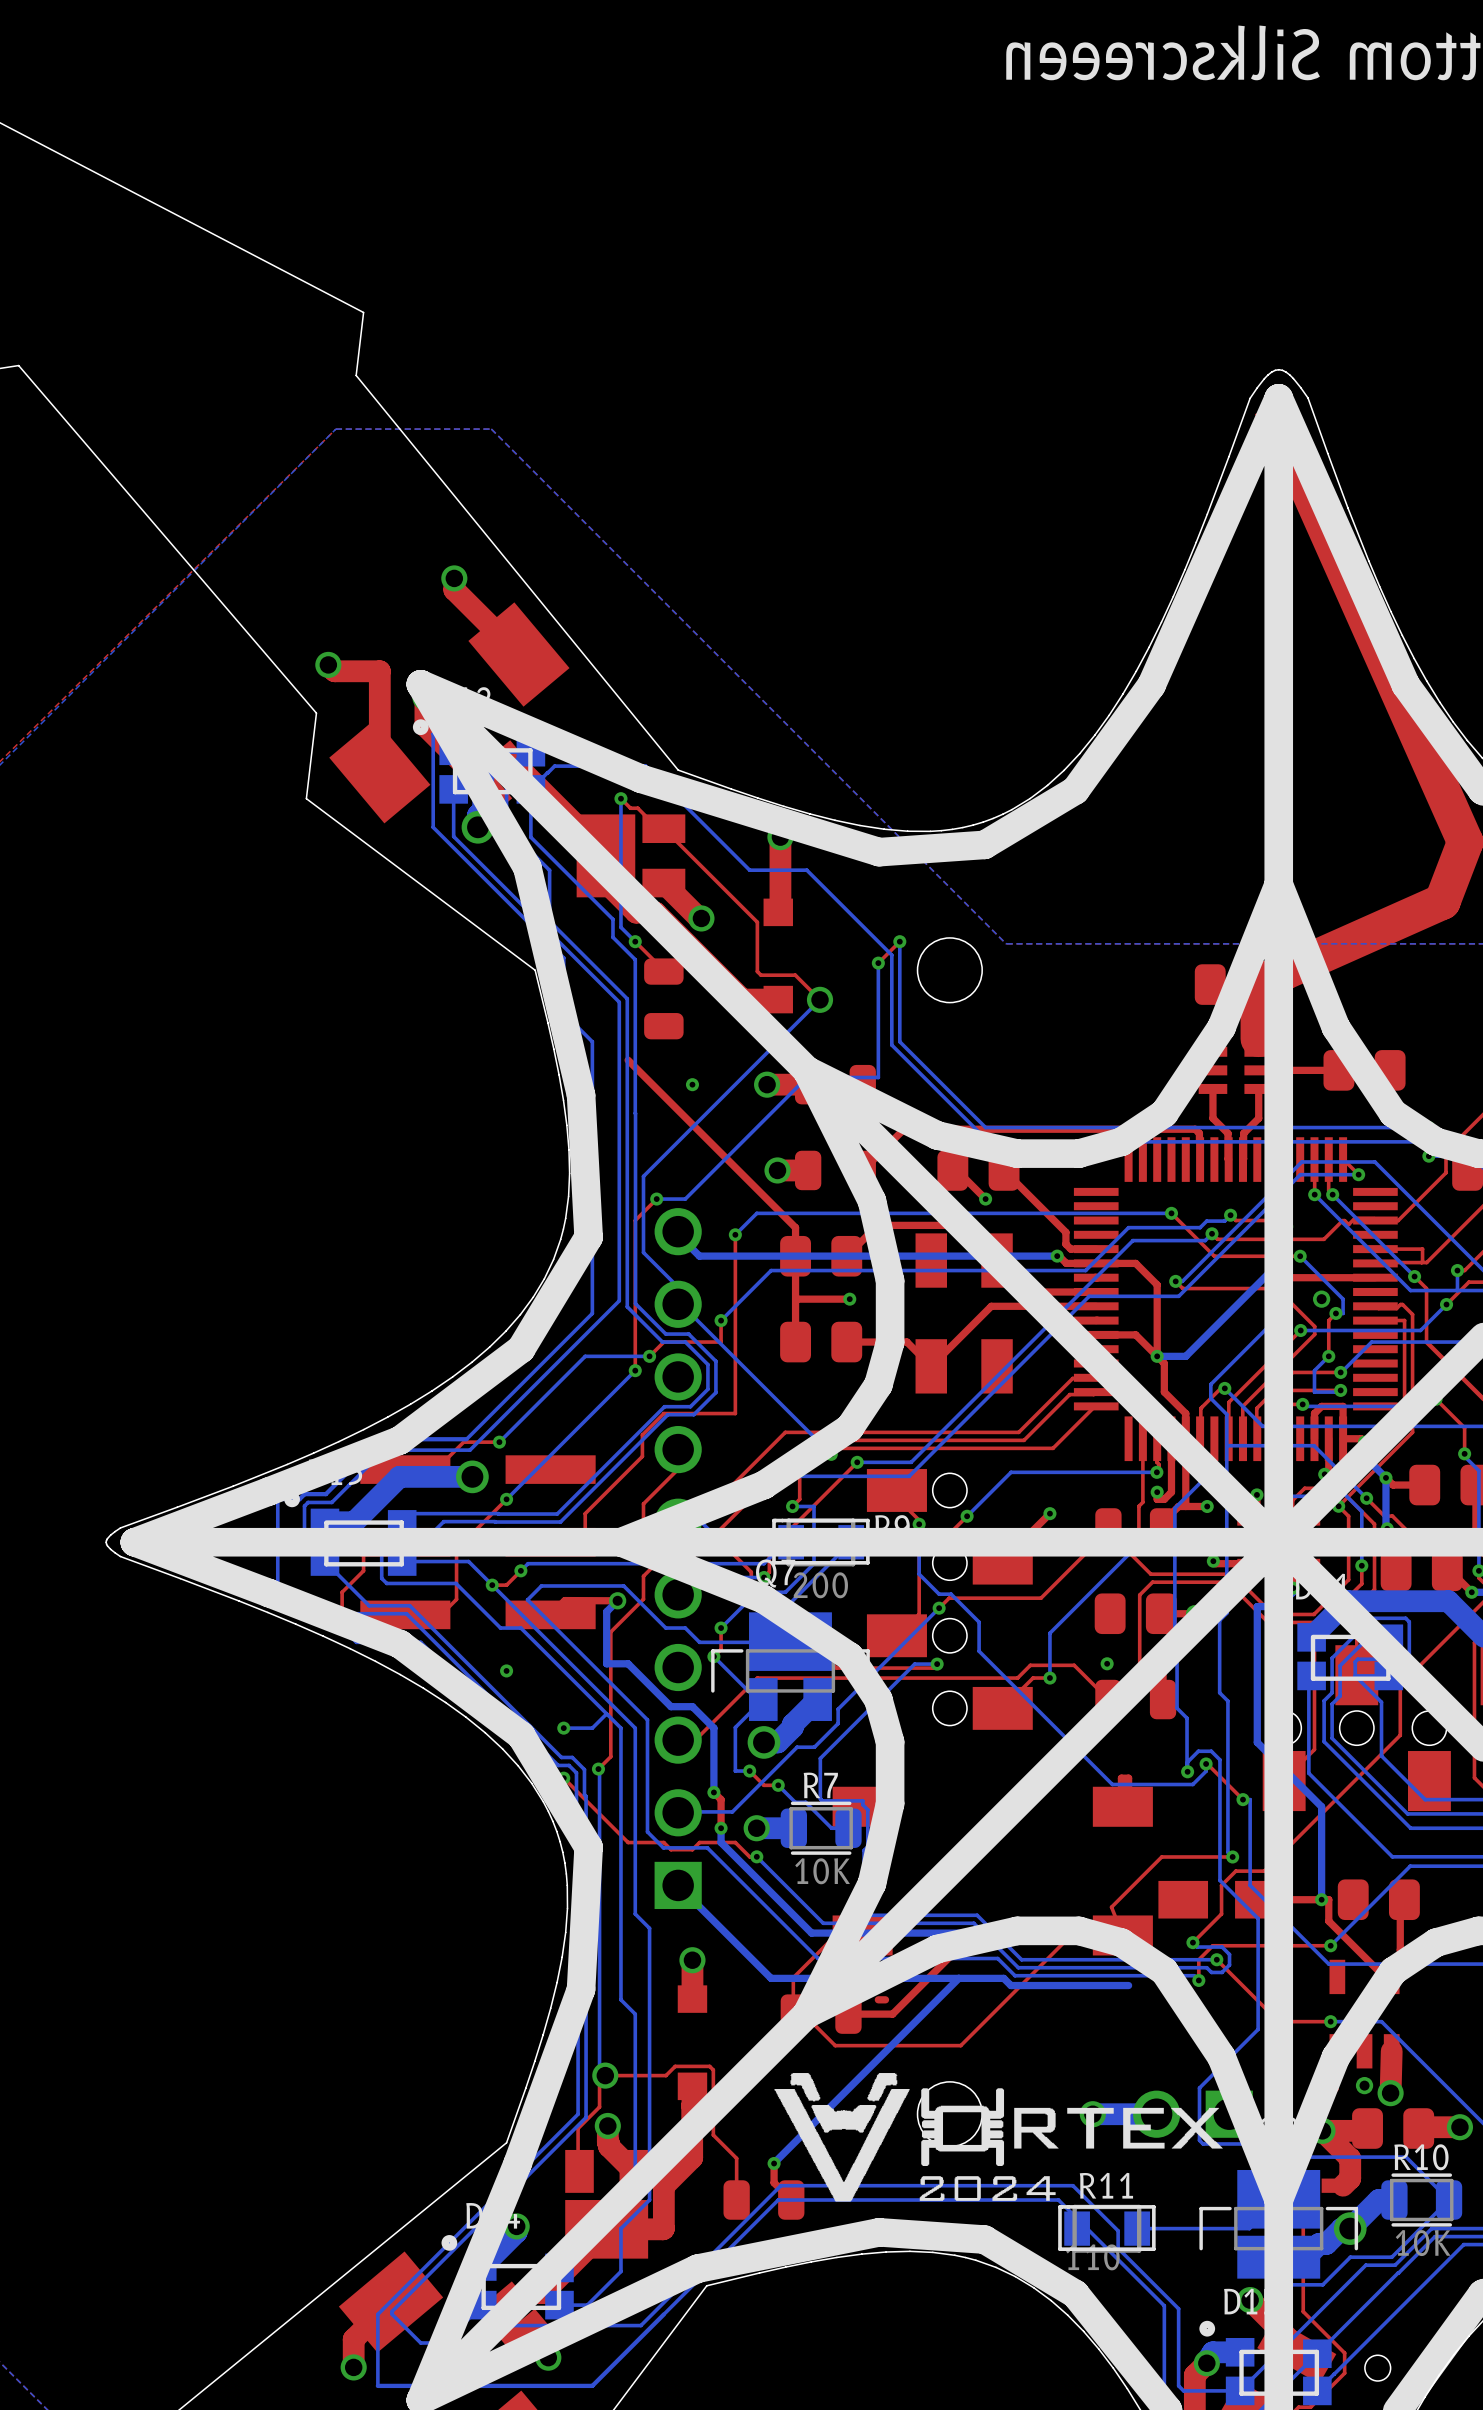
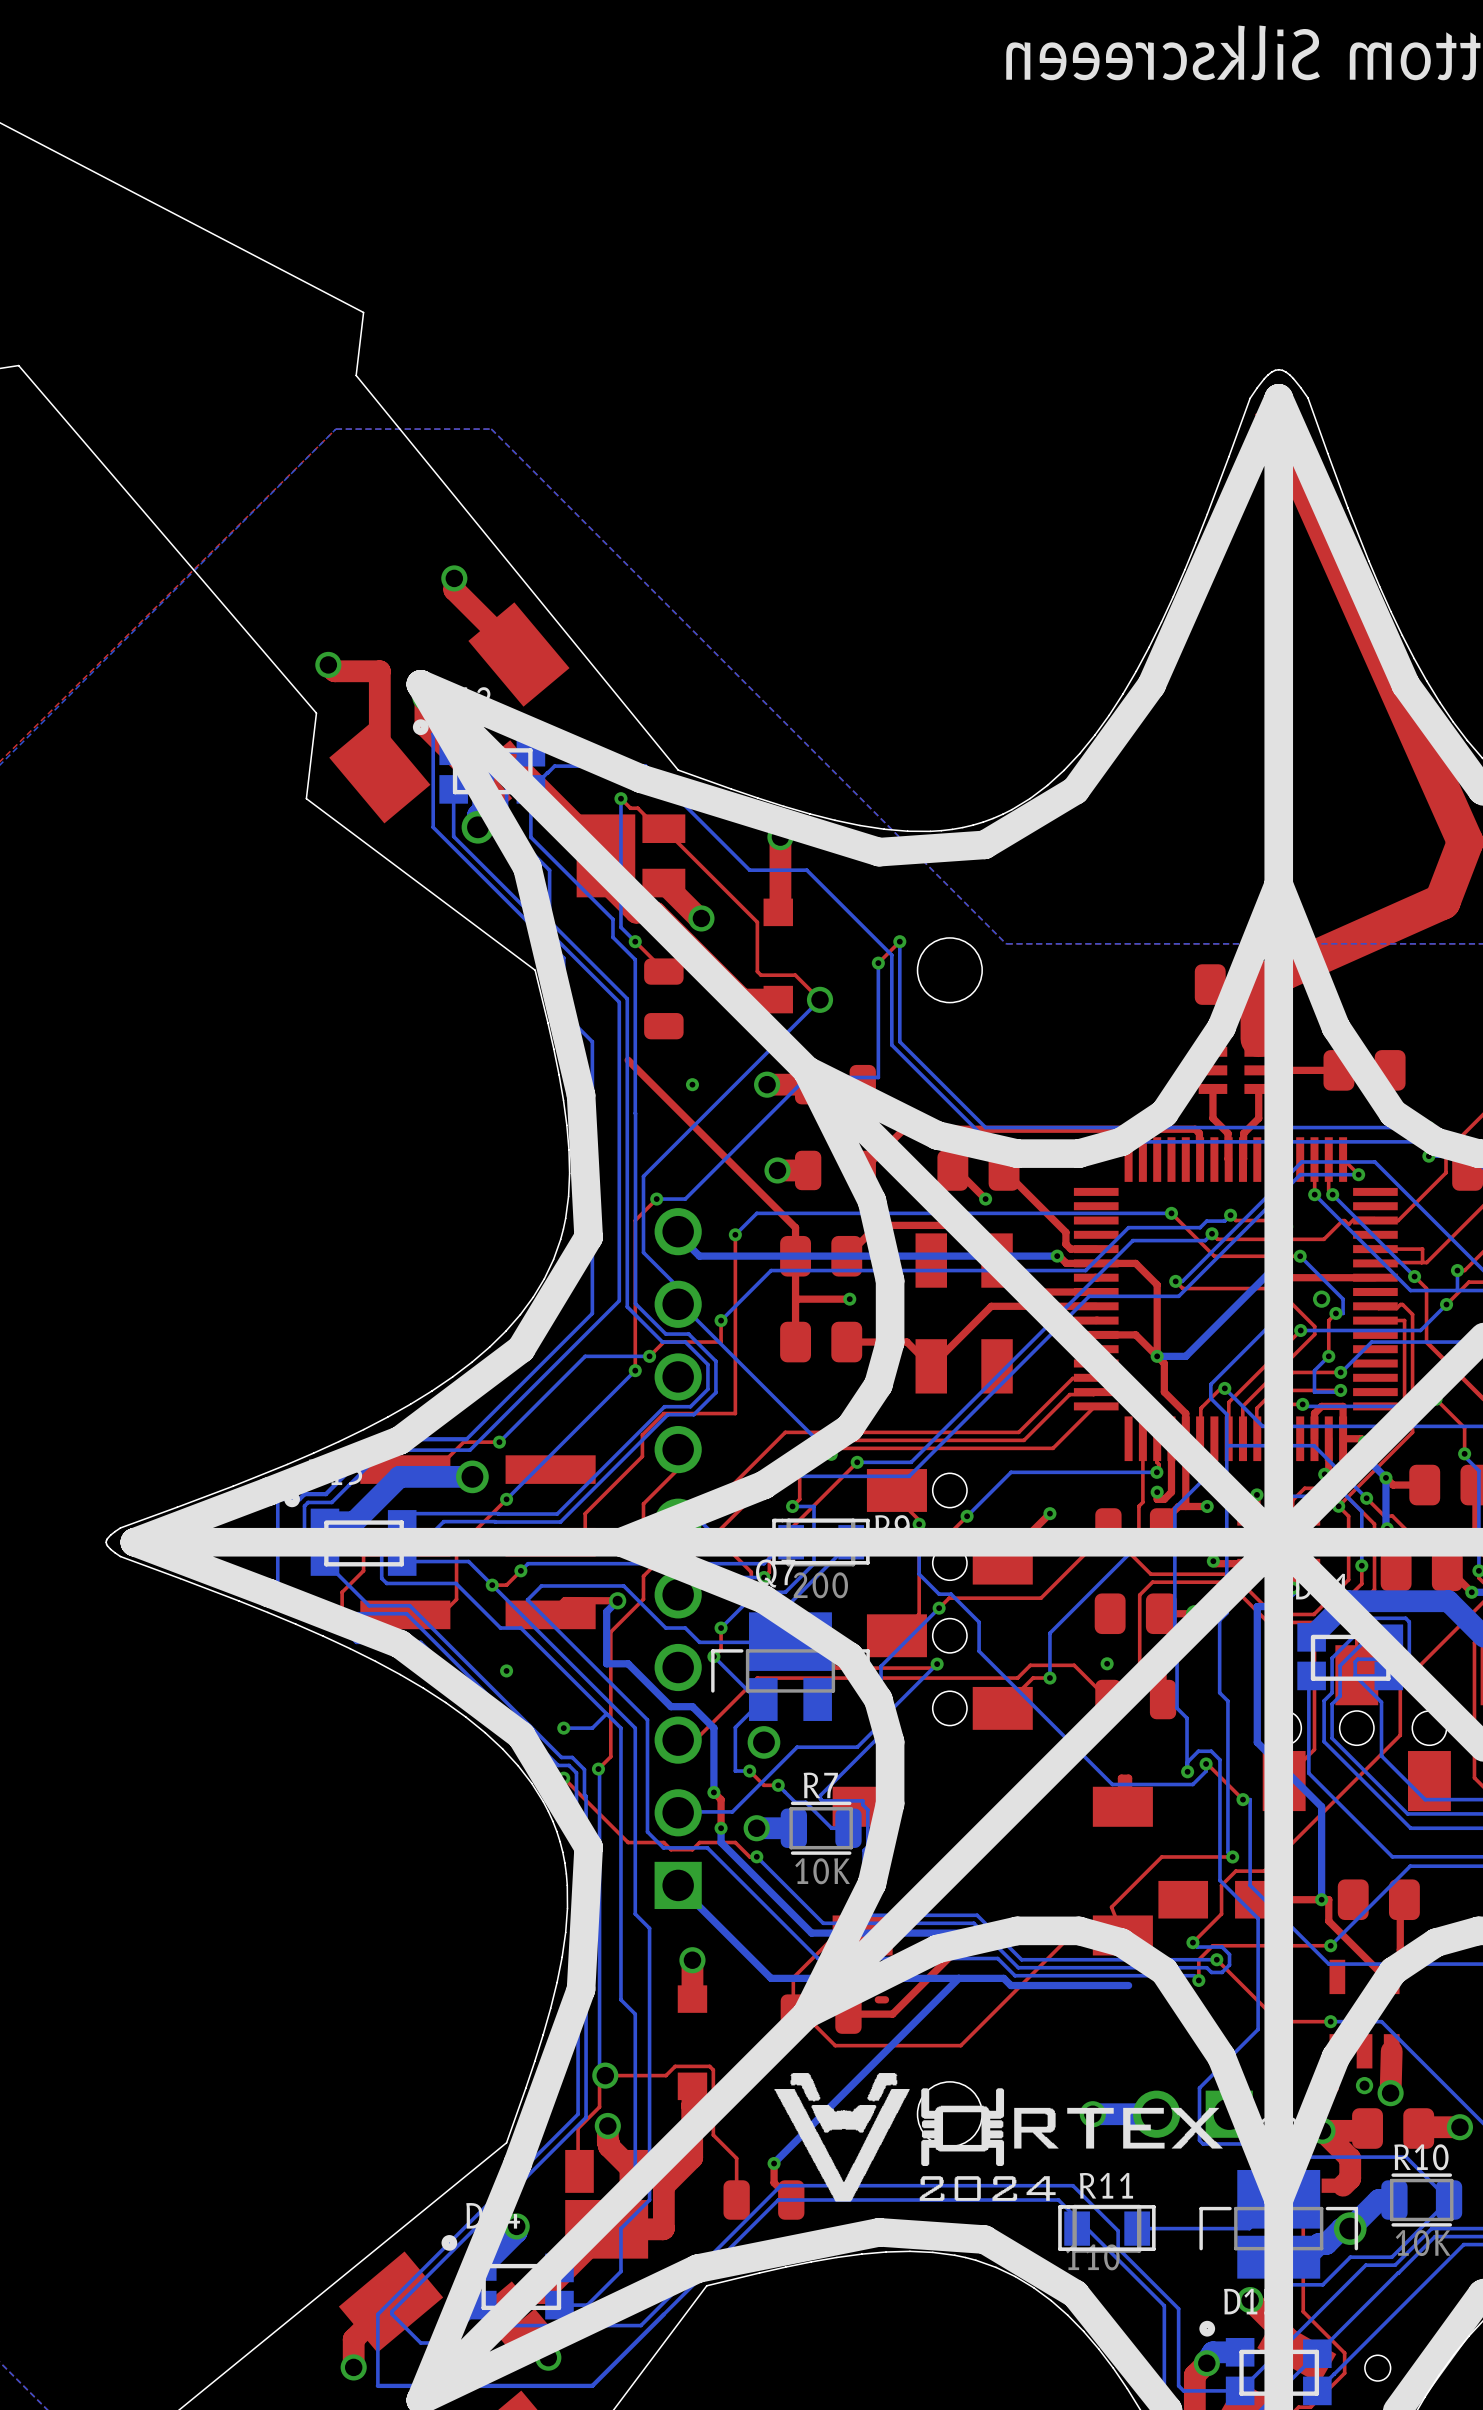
bottom track: (937, 1664) (914, 1664) (820, 1758) (820, 1795) -> (937, 1664) (889, 1712) (889, 1726) (820, 1795)
bottom track: (881, 1666) (838, 1709) (838, 1723) (814, 1747) -> (881, 1666) (881, 1723) (857, 1747) (814, 1747)
bottom track: (817, 1699) (777, 1742) (763, 1742) -> none

